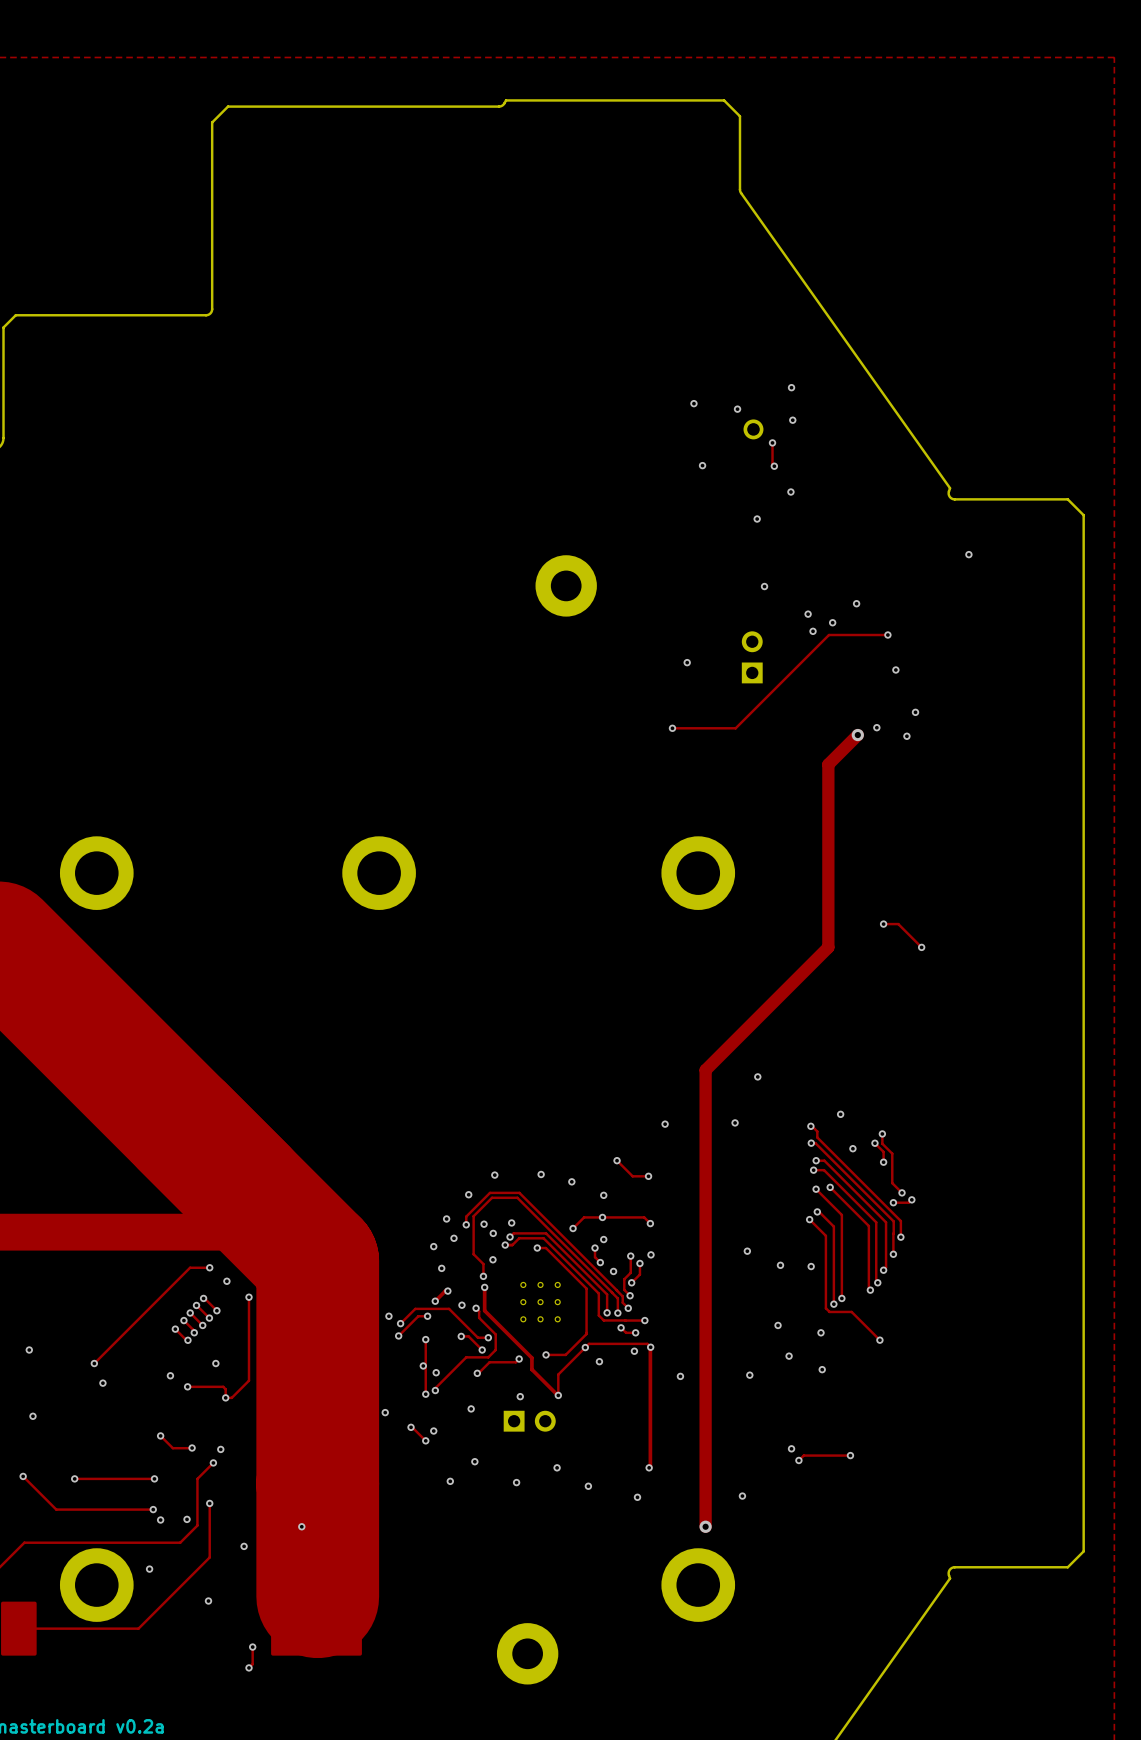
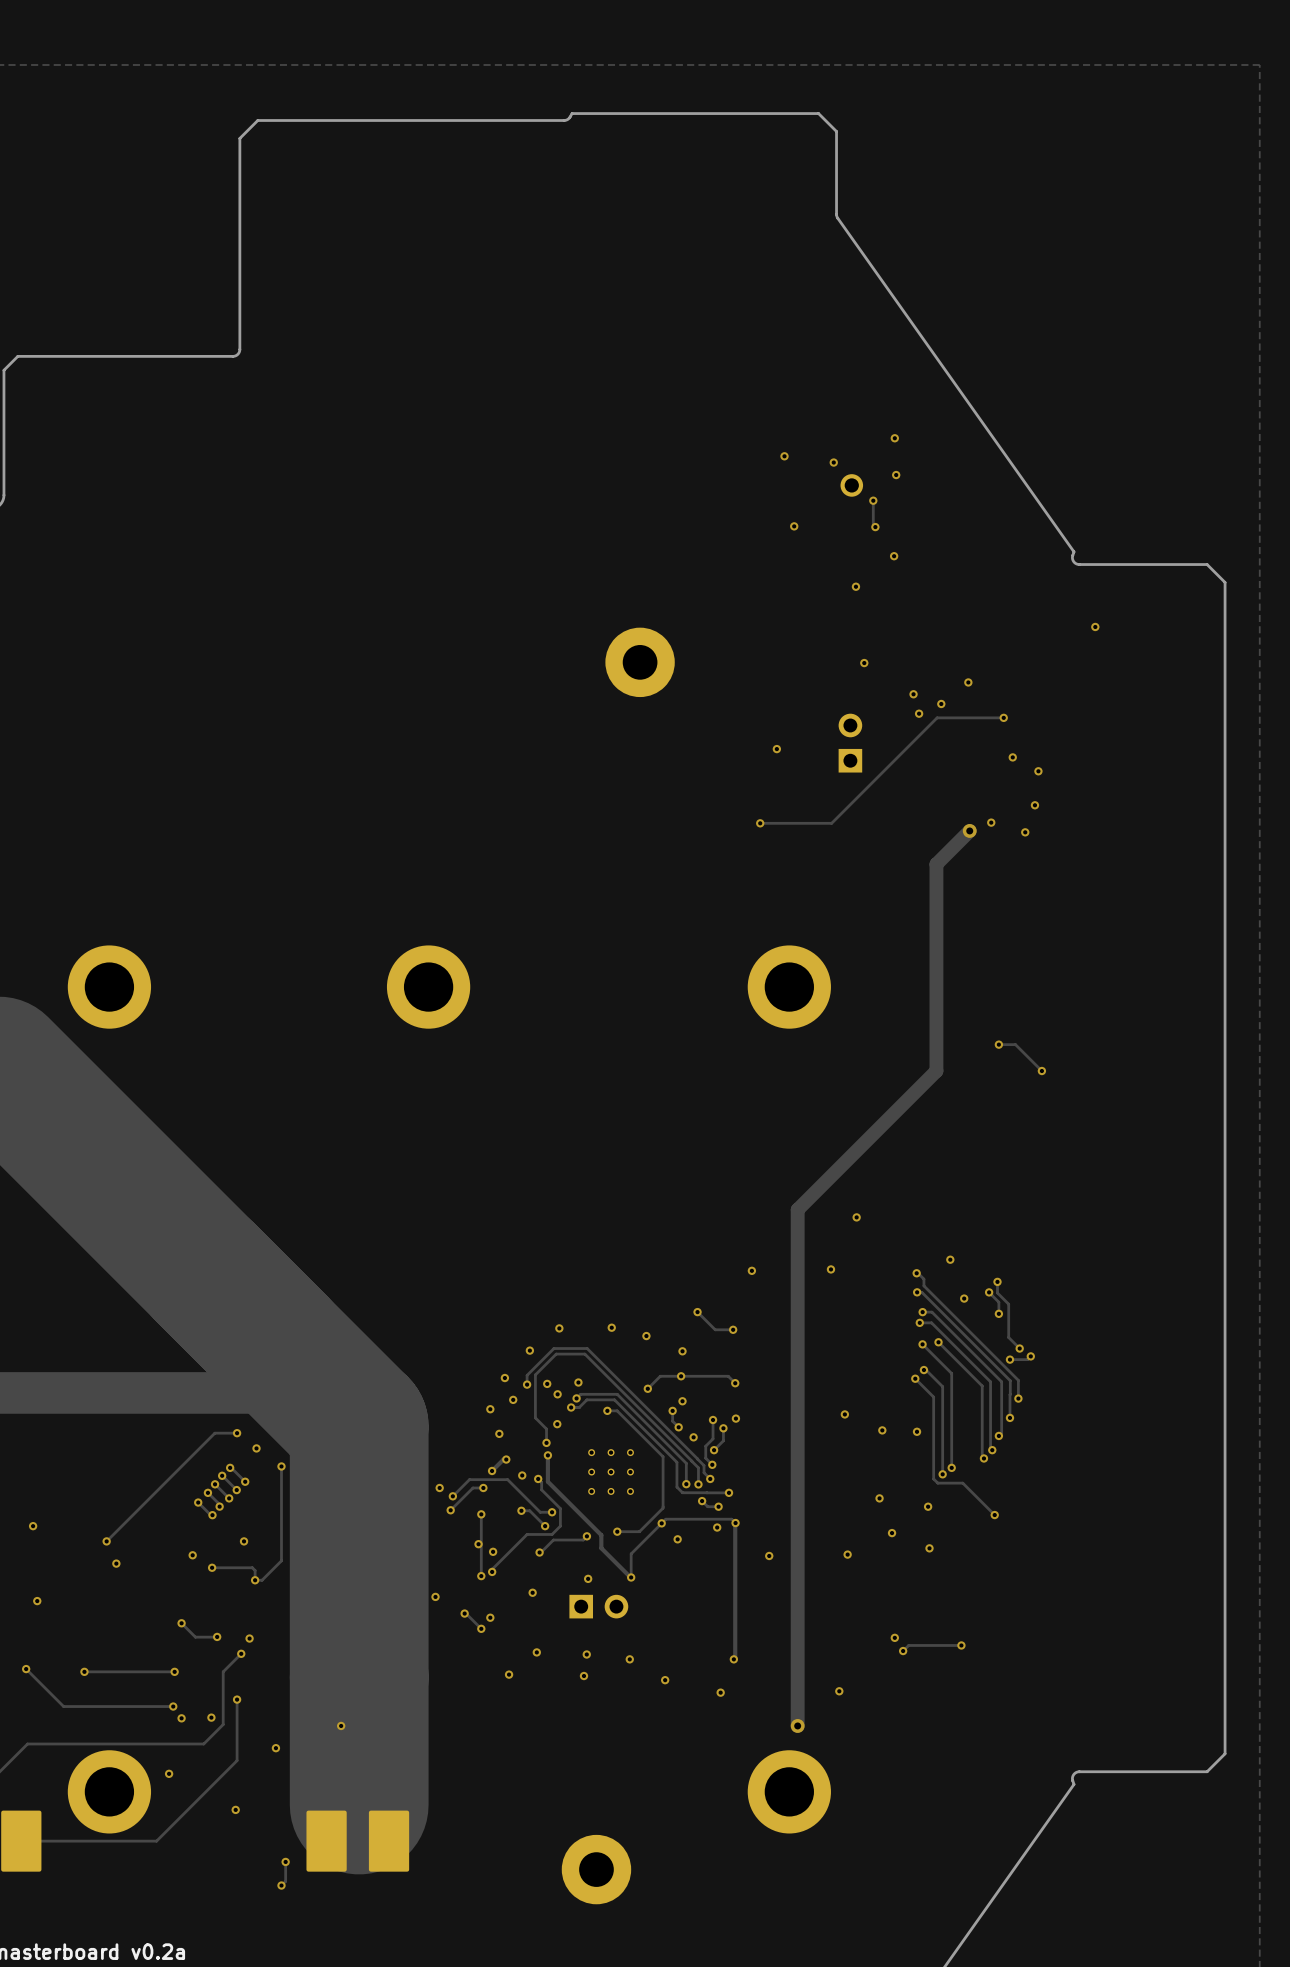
via: none -> (1038, 771)
via: none -> (586, 1654)

